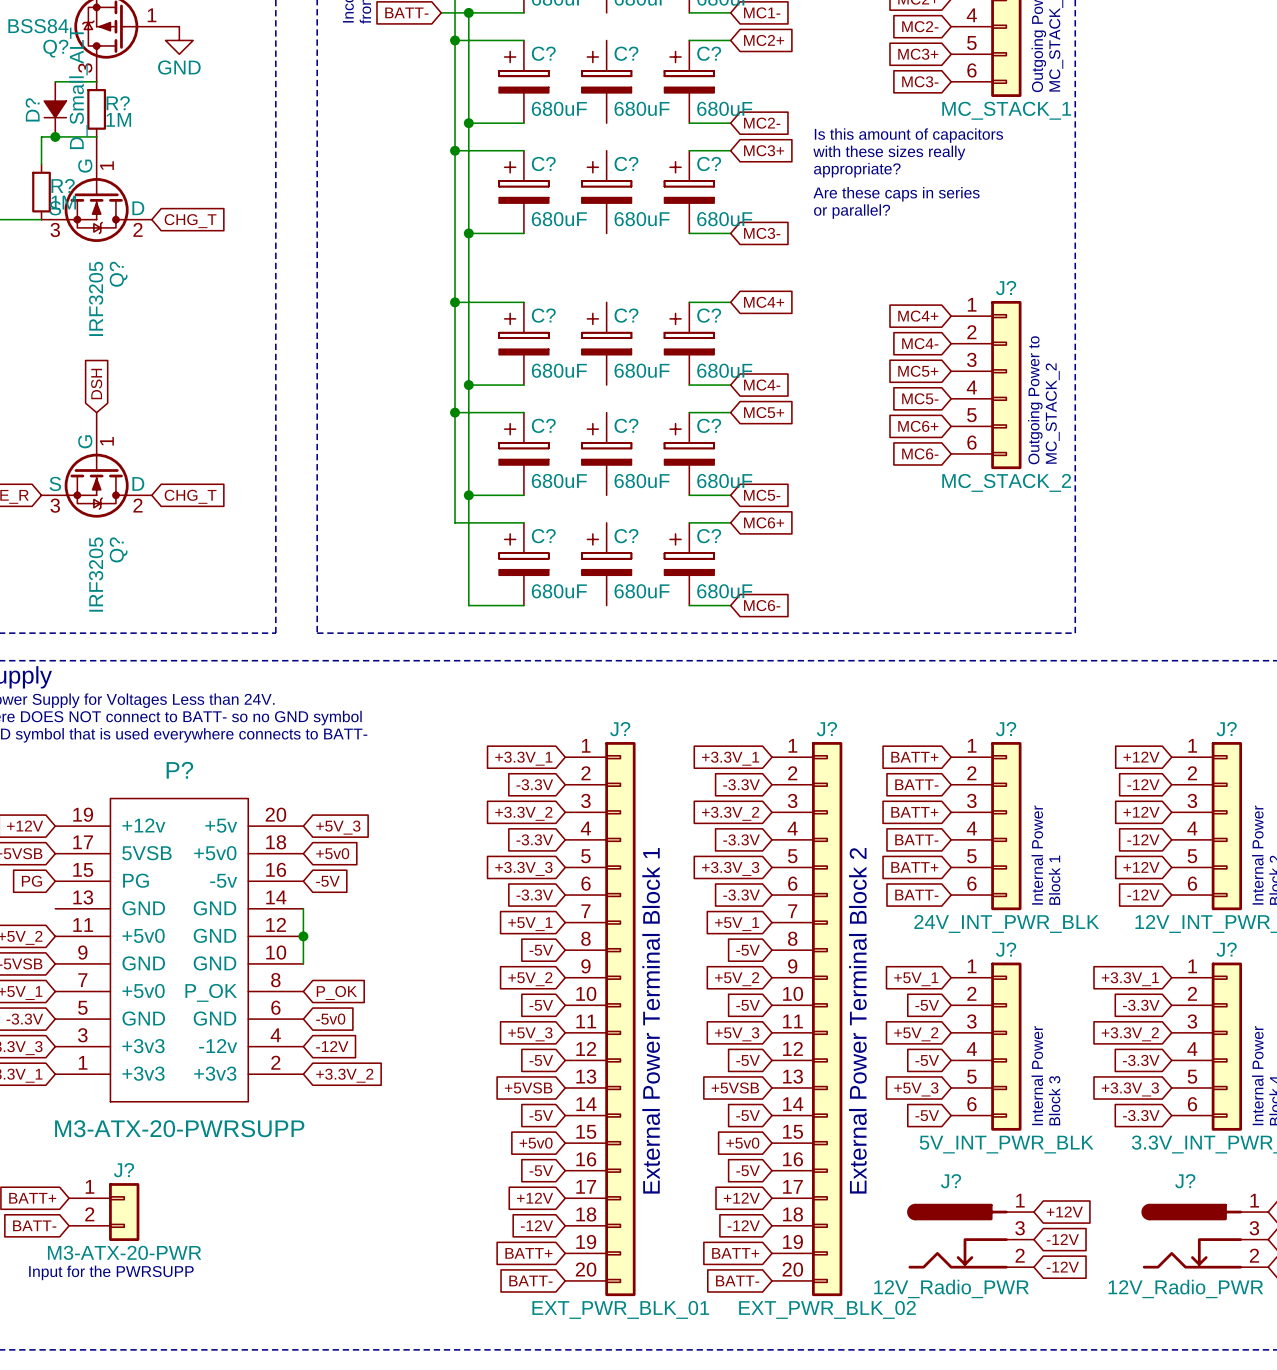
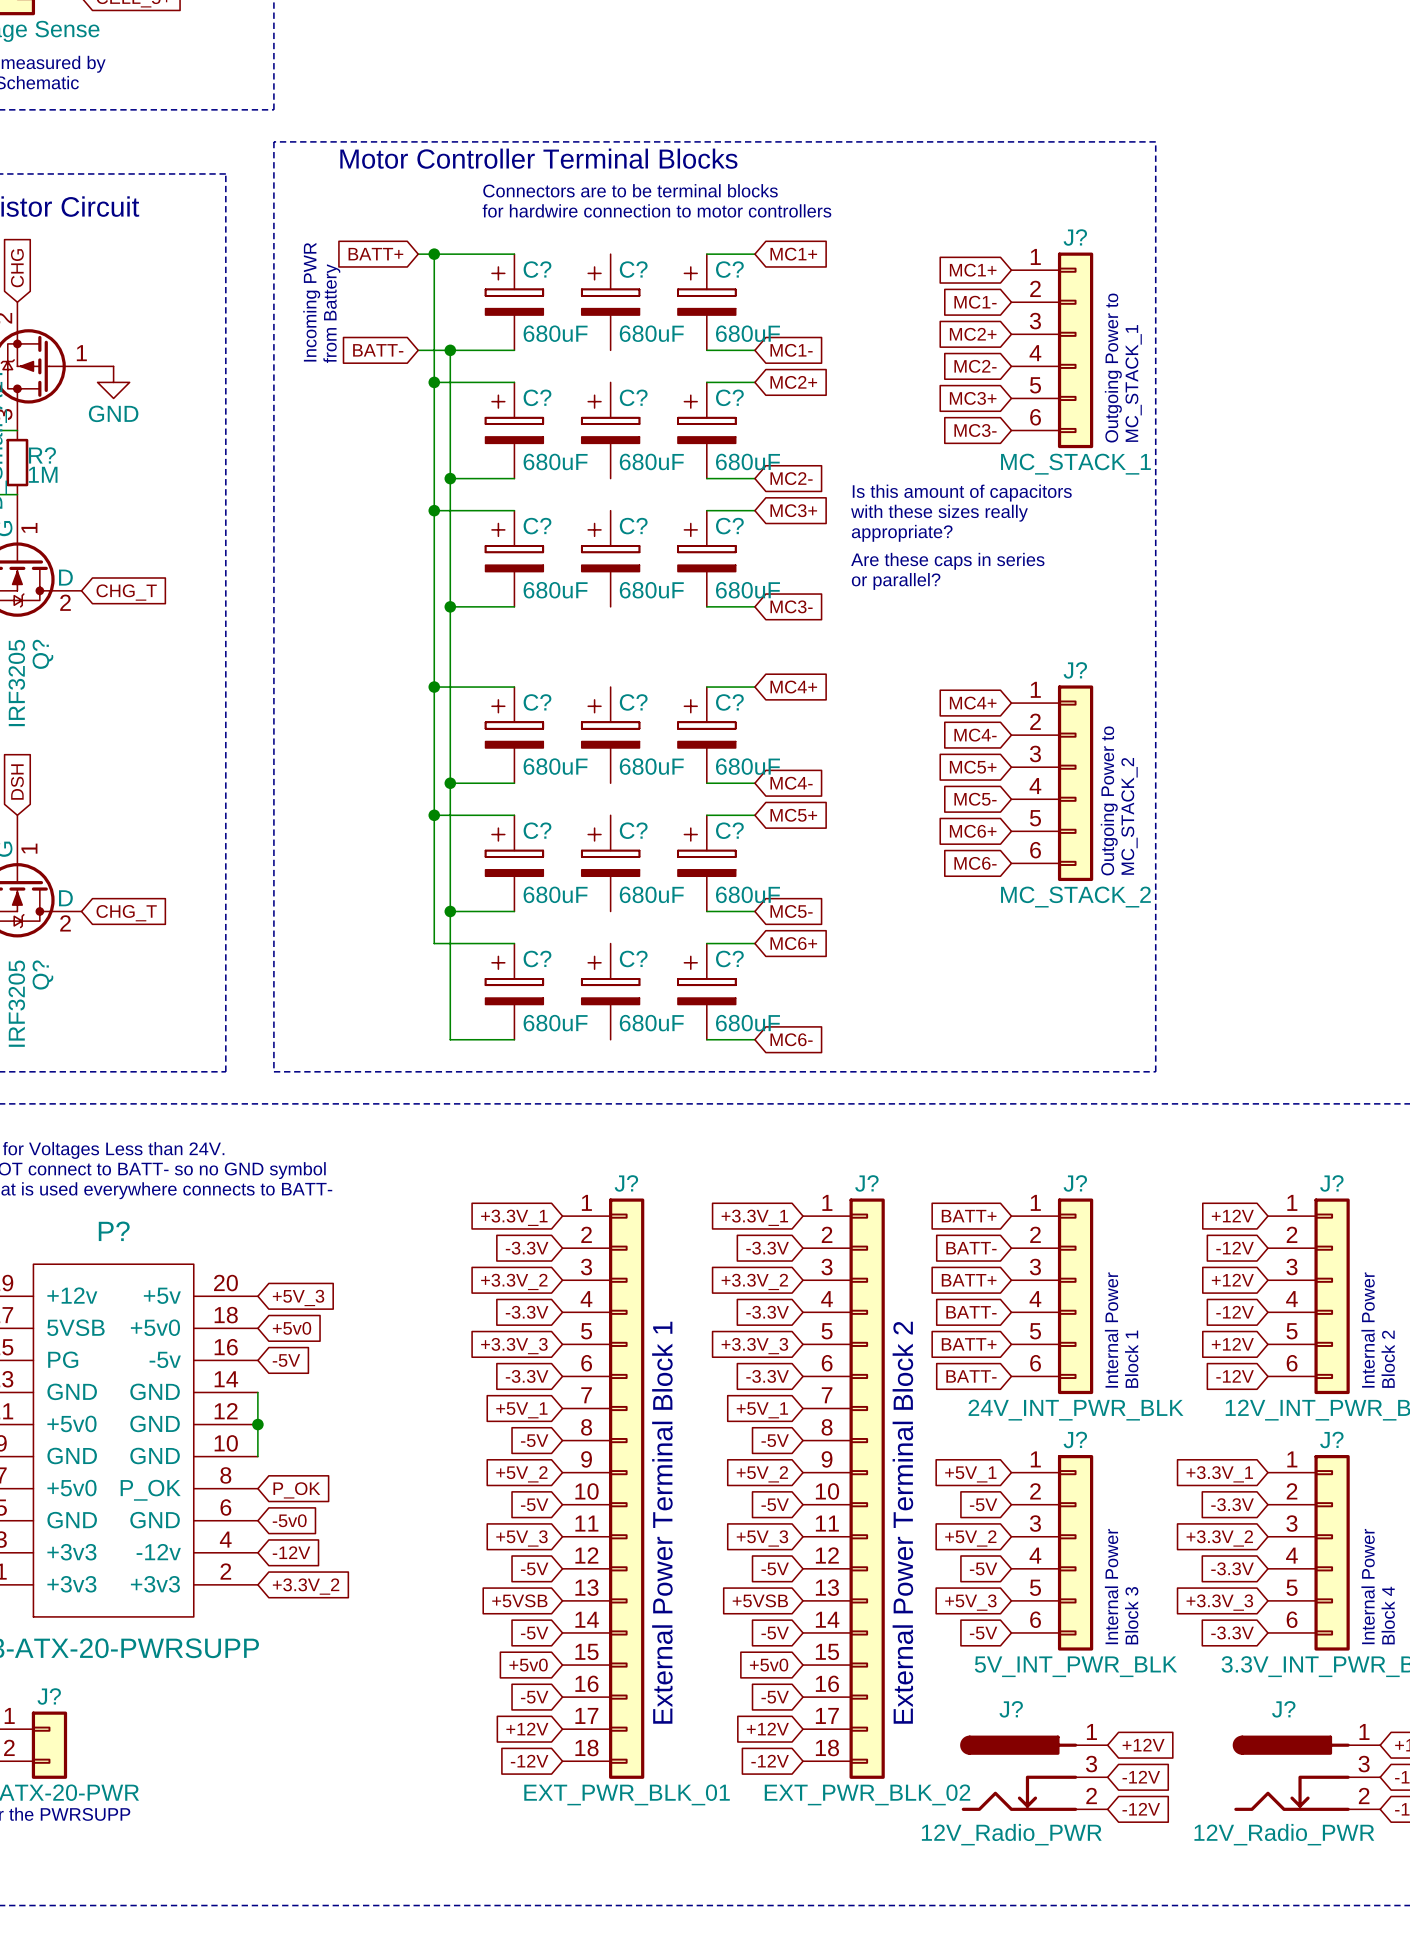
J?: none -> EXT_PWR_BLK_01 (603, 1488)
J?: none -> EXT_PWR_BLK_02 (843, 1488)
J?: EXT_PWR_BLK_01 (600, 1019) -> none
J?: EXT_PWR_BLK_02 (807, 1019) -> none
global label: BATT+ (528, 1253) -> none
global label: BATT+ (735, 1253) -> none
global label: BATT- (530, 1280) -> none
global label: BATT- (737, 1280) -> none

